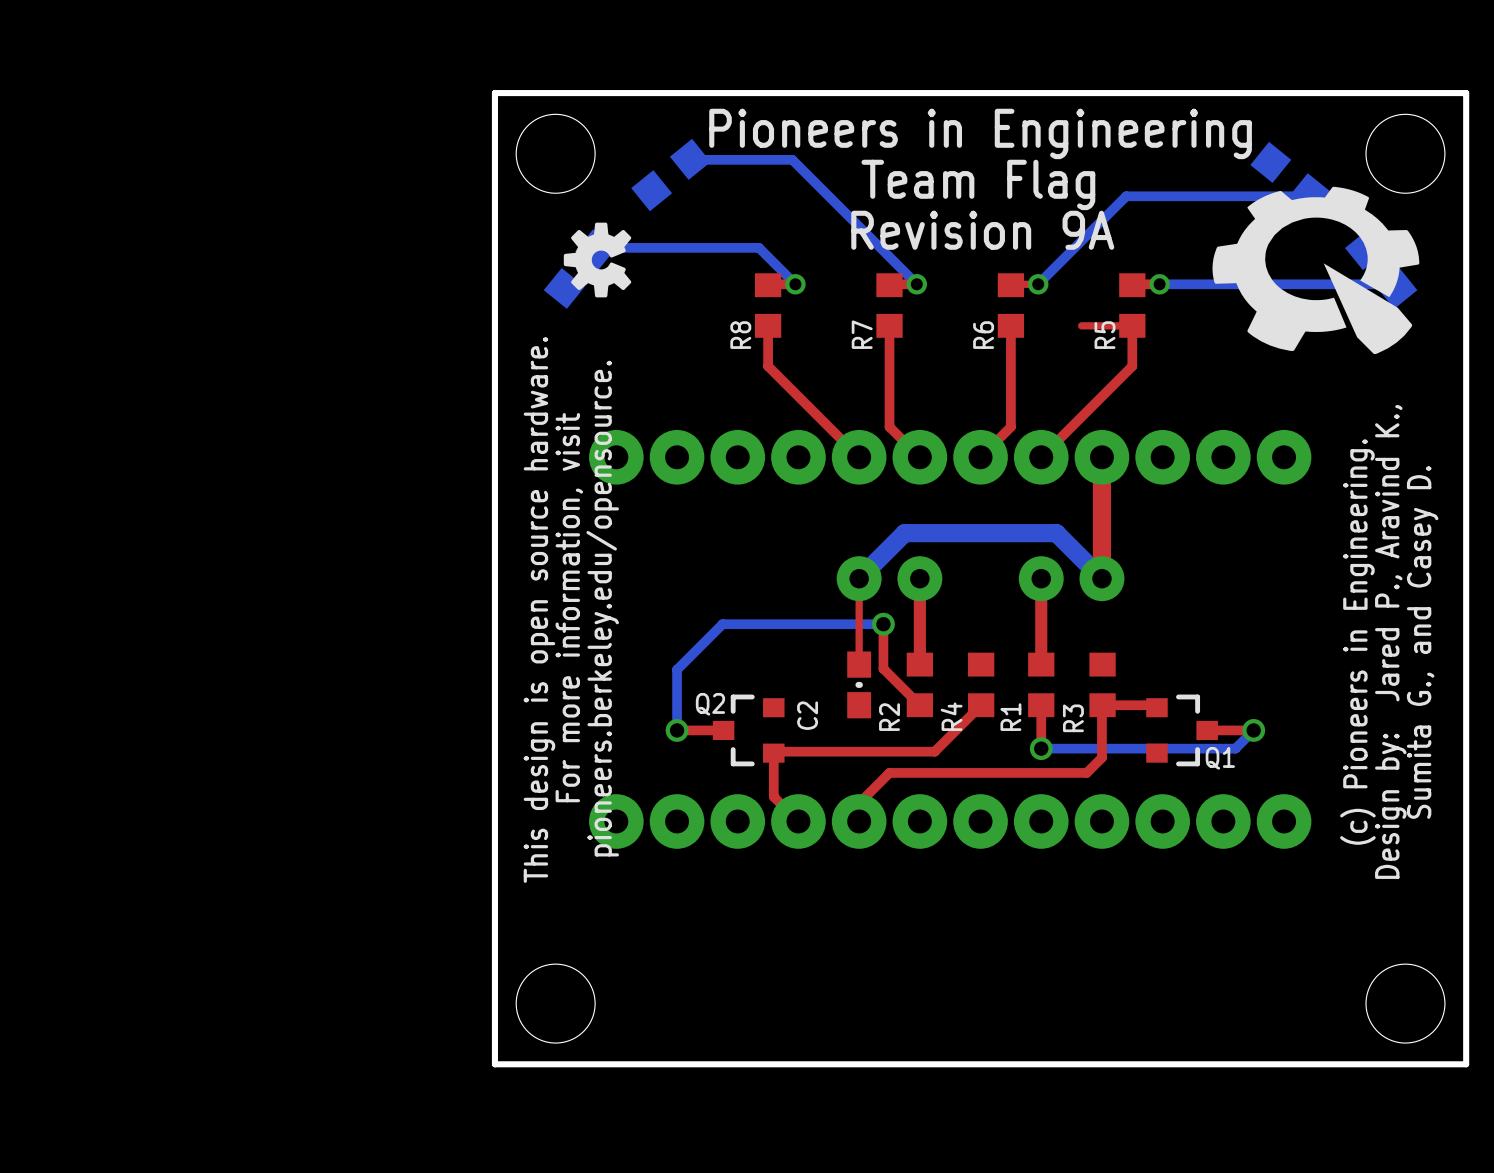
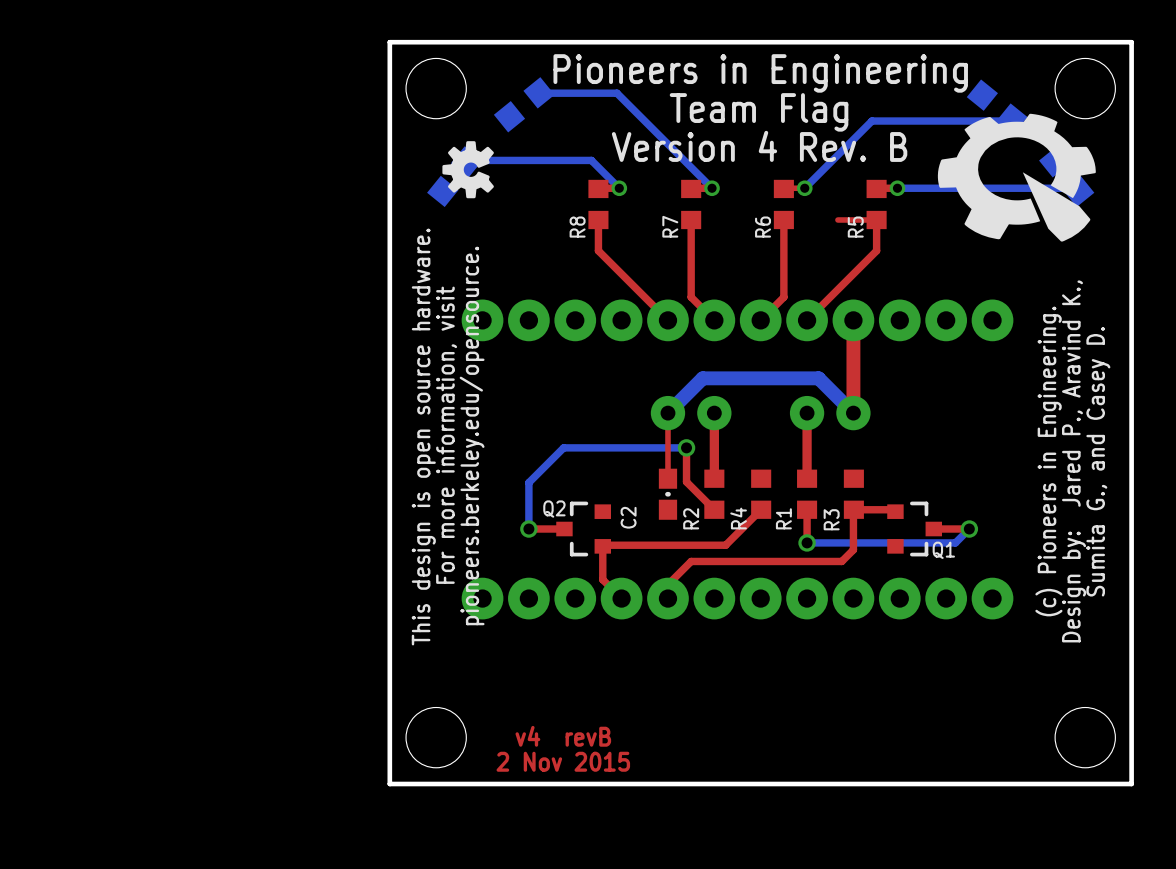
text: Revision 9A (982, 230) -> Version 4 Rev. B (759, 146)
text: none -> v4 revB (563, 736)
text: none -> 2 Nov 2015 (563, 761)

